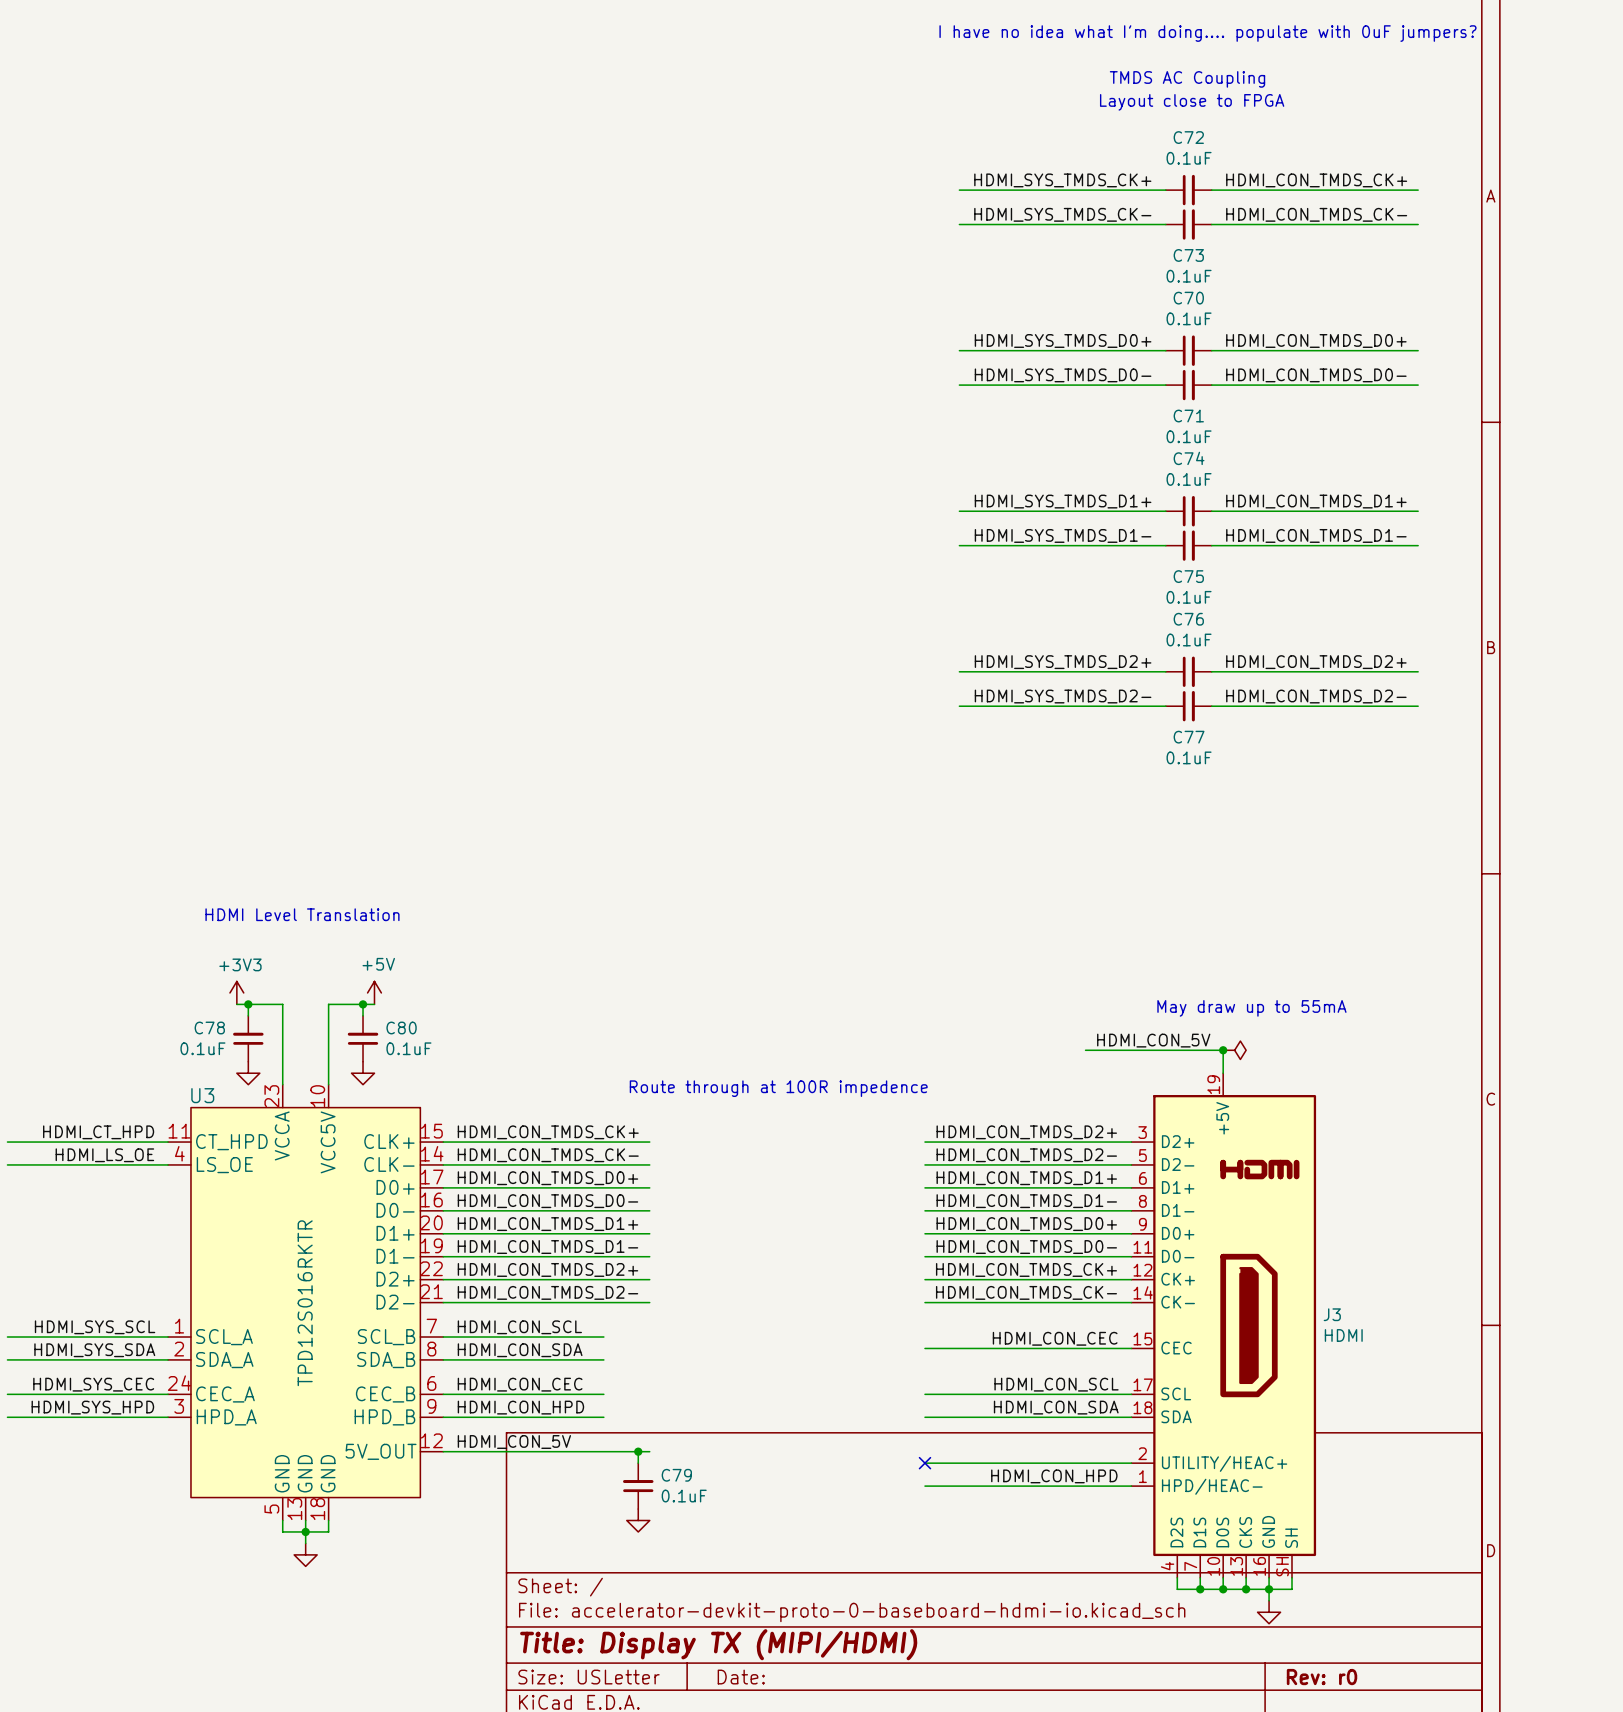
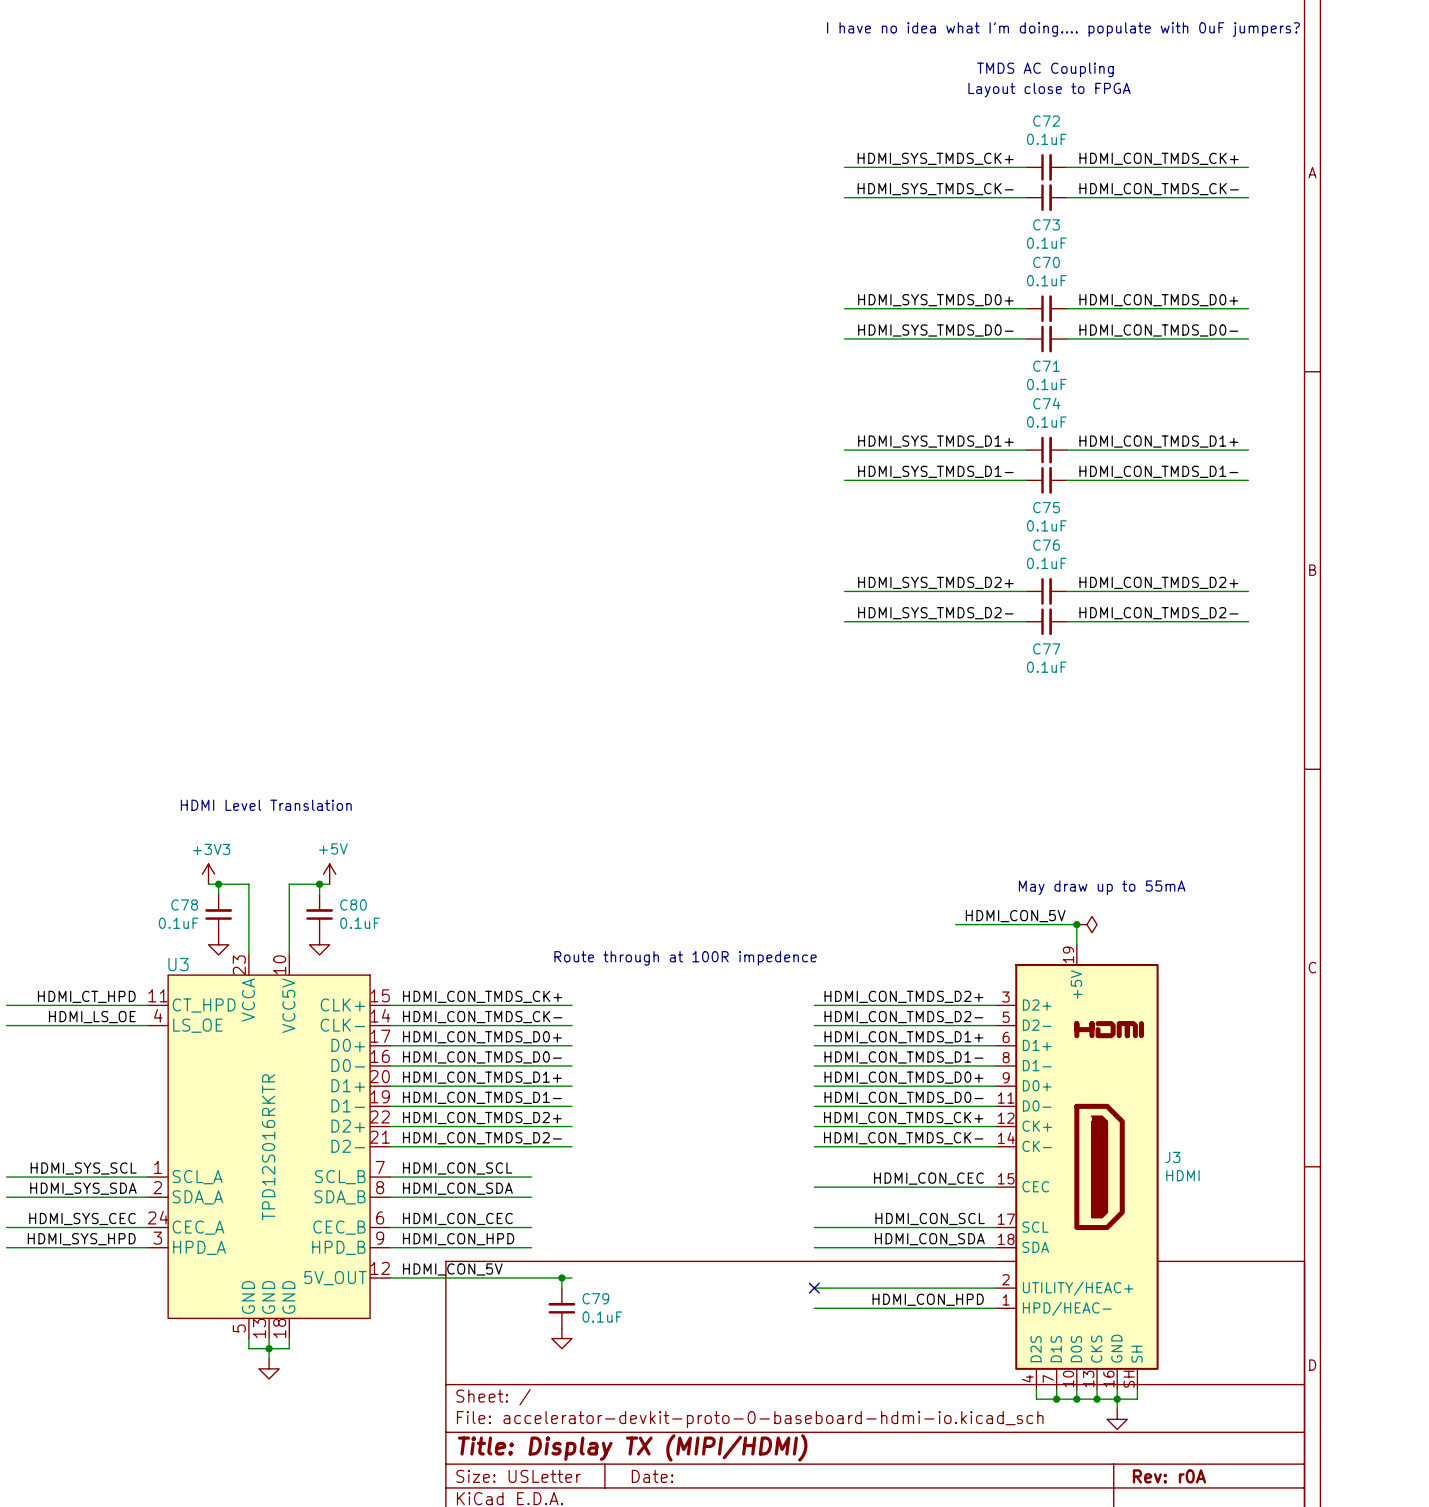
title block: Rev: r0 (1322, 1677) -> Rev: r0A (1169, 1476)

